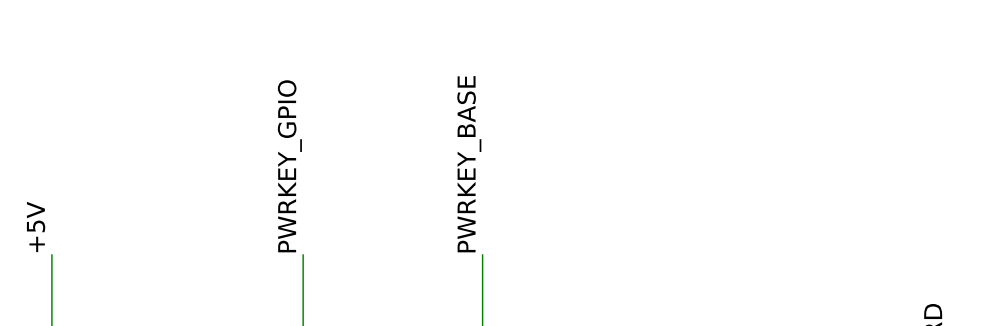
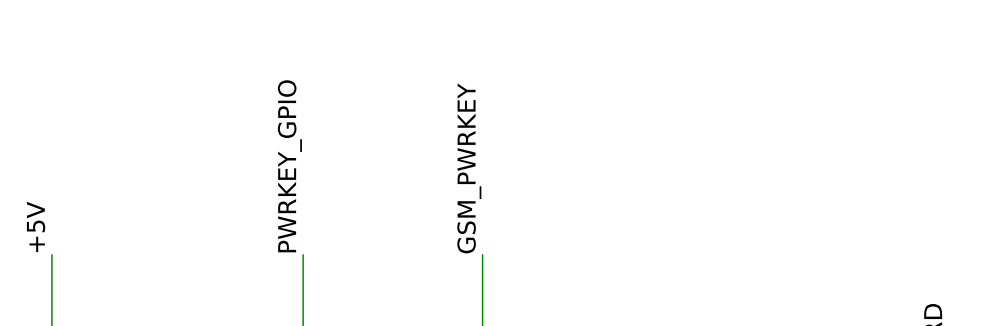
label: PWRKEY_BASE (469, 164) -> GSM_PWRKEY (469, 168)

